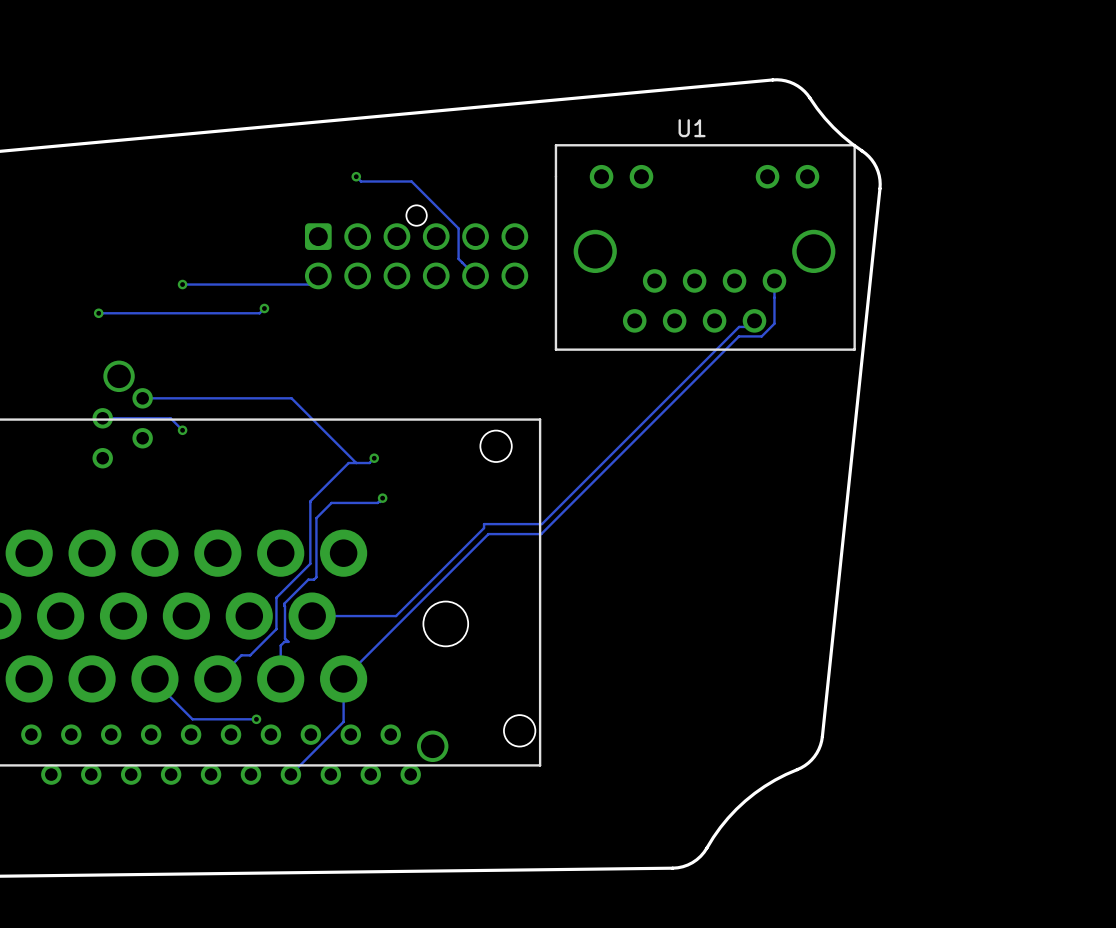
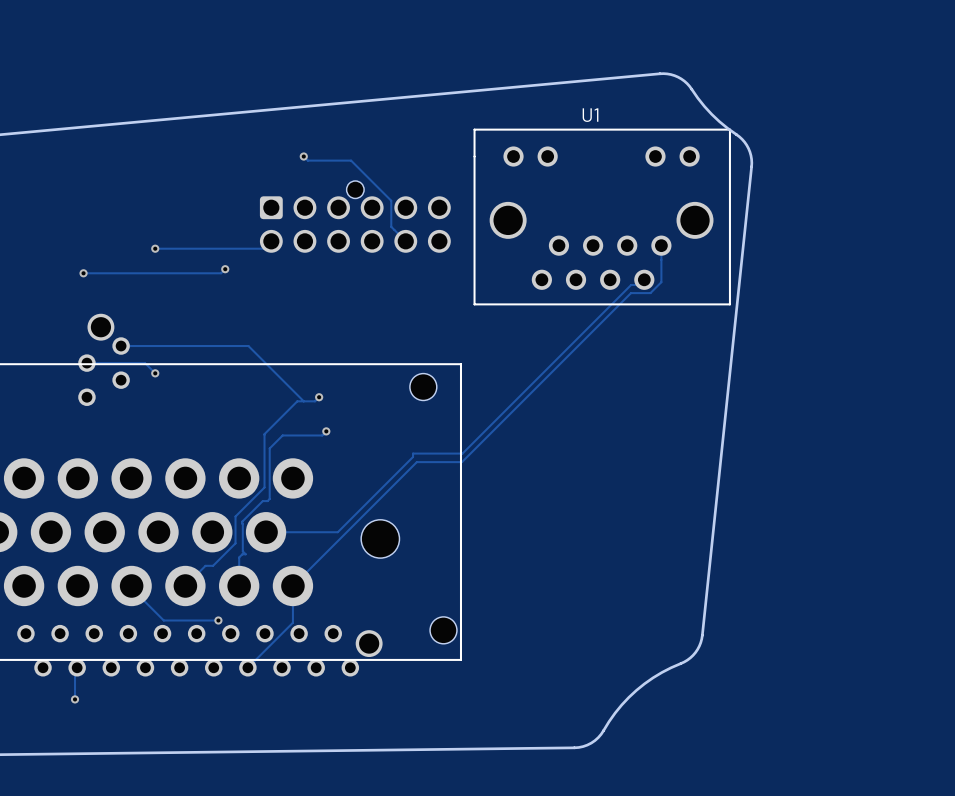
track: none -> (77, 667) (75, 669) (75, 699)
via: none -> (75, 699)

